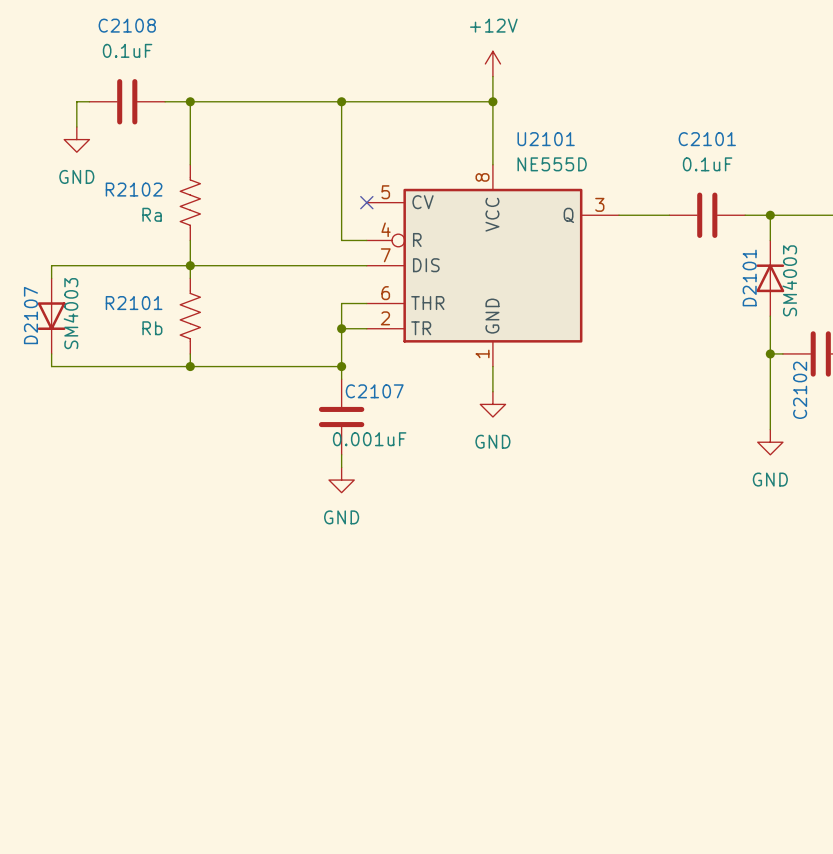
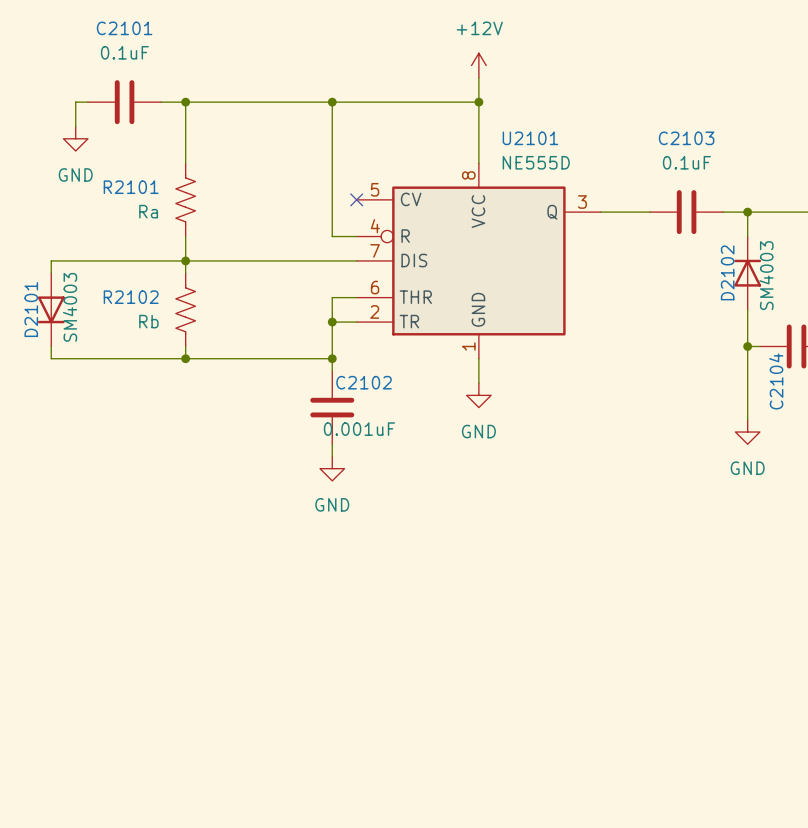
C2108 name: C2108 (127, 25) -> C2101 (124, 28)
C2101 name: C2101 (707, 139) -> C2103 (686, 138)
R2102 name: R2102 (134, 189) -> R2101 (131, 187)
D2101 name: D2101 (749, 278) -> D2102 (727, 272)
R2101 name: R2101 (134, 303) -> R2102 (131, 297)
D2107 name: D2107 (30, 315) -> D2101 (31, 309)
C2102 name: C2102 (800, 390) -> C2104 (776, 381)
C2107 name: C2107 (374, 391) -> C2102 (364, 382)

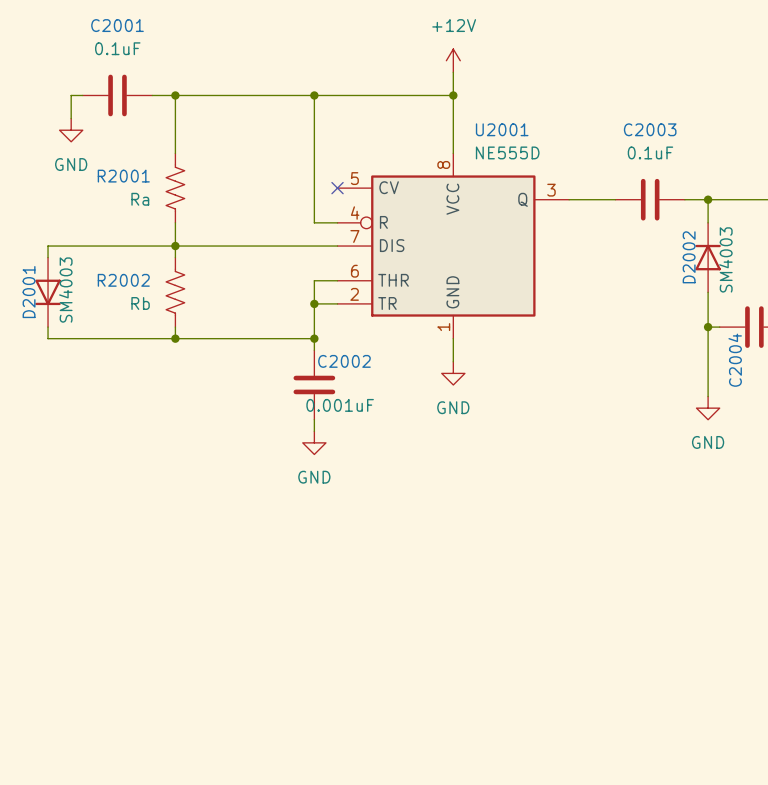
C2101 name: C2101 (124, 28) -> C2001 (117, 25)
U2101 name: U2101 (530, 138) -> U2001 (502, 129)
C2103 name: C2103 (686, 138) -> C2003 (650, 129)
R2101 name: R2101 (131, 187) -> R2001 (123, 176)
D2102 name: D2102 (727, 272) -> D2002 (689, 257)
R2102 name: R2102 (131, 297) -> R2002 (123, 280)
D2101 name: D2101 (31, 309) -> D2001 (29, 292)
C2104 name: C2104 (776, 381) -> C2004 (735, 360)
C2102 name: C2102 (364, 382) -> C2002 (344, 361)

